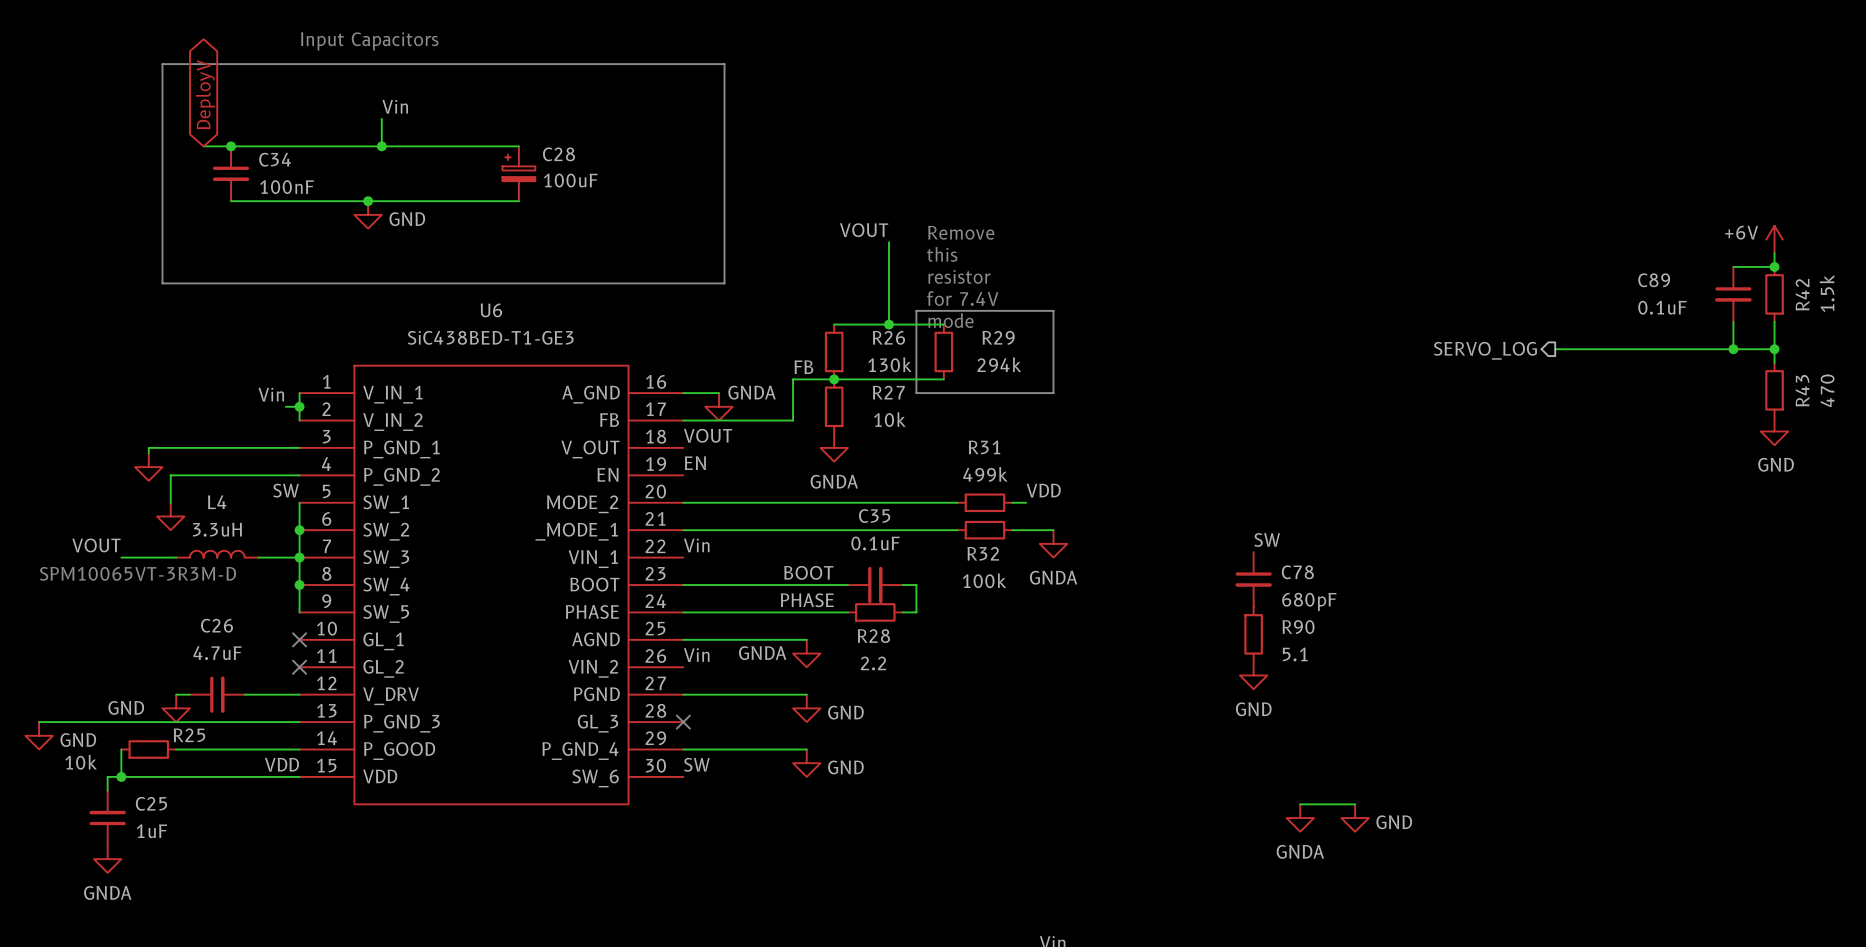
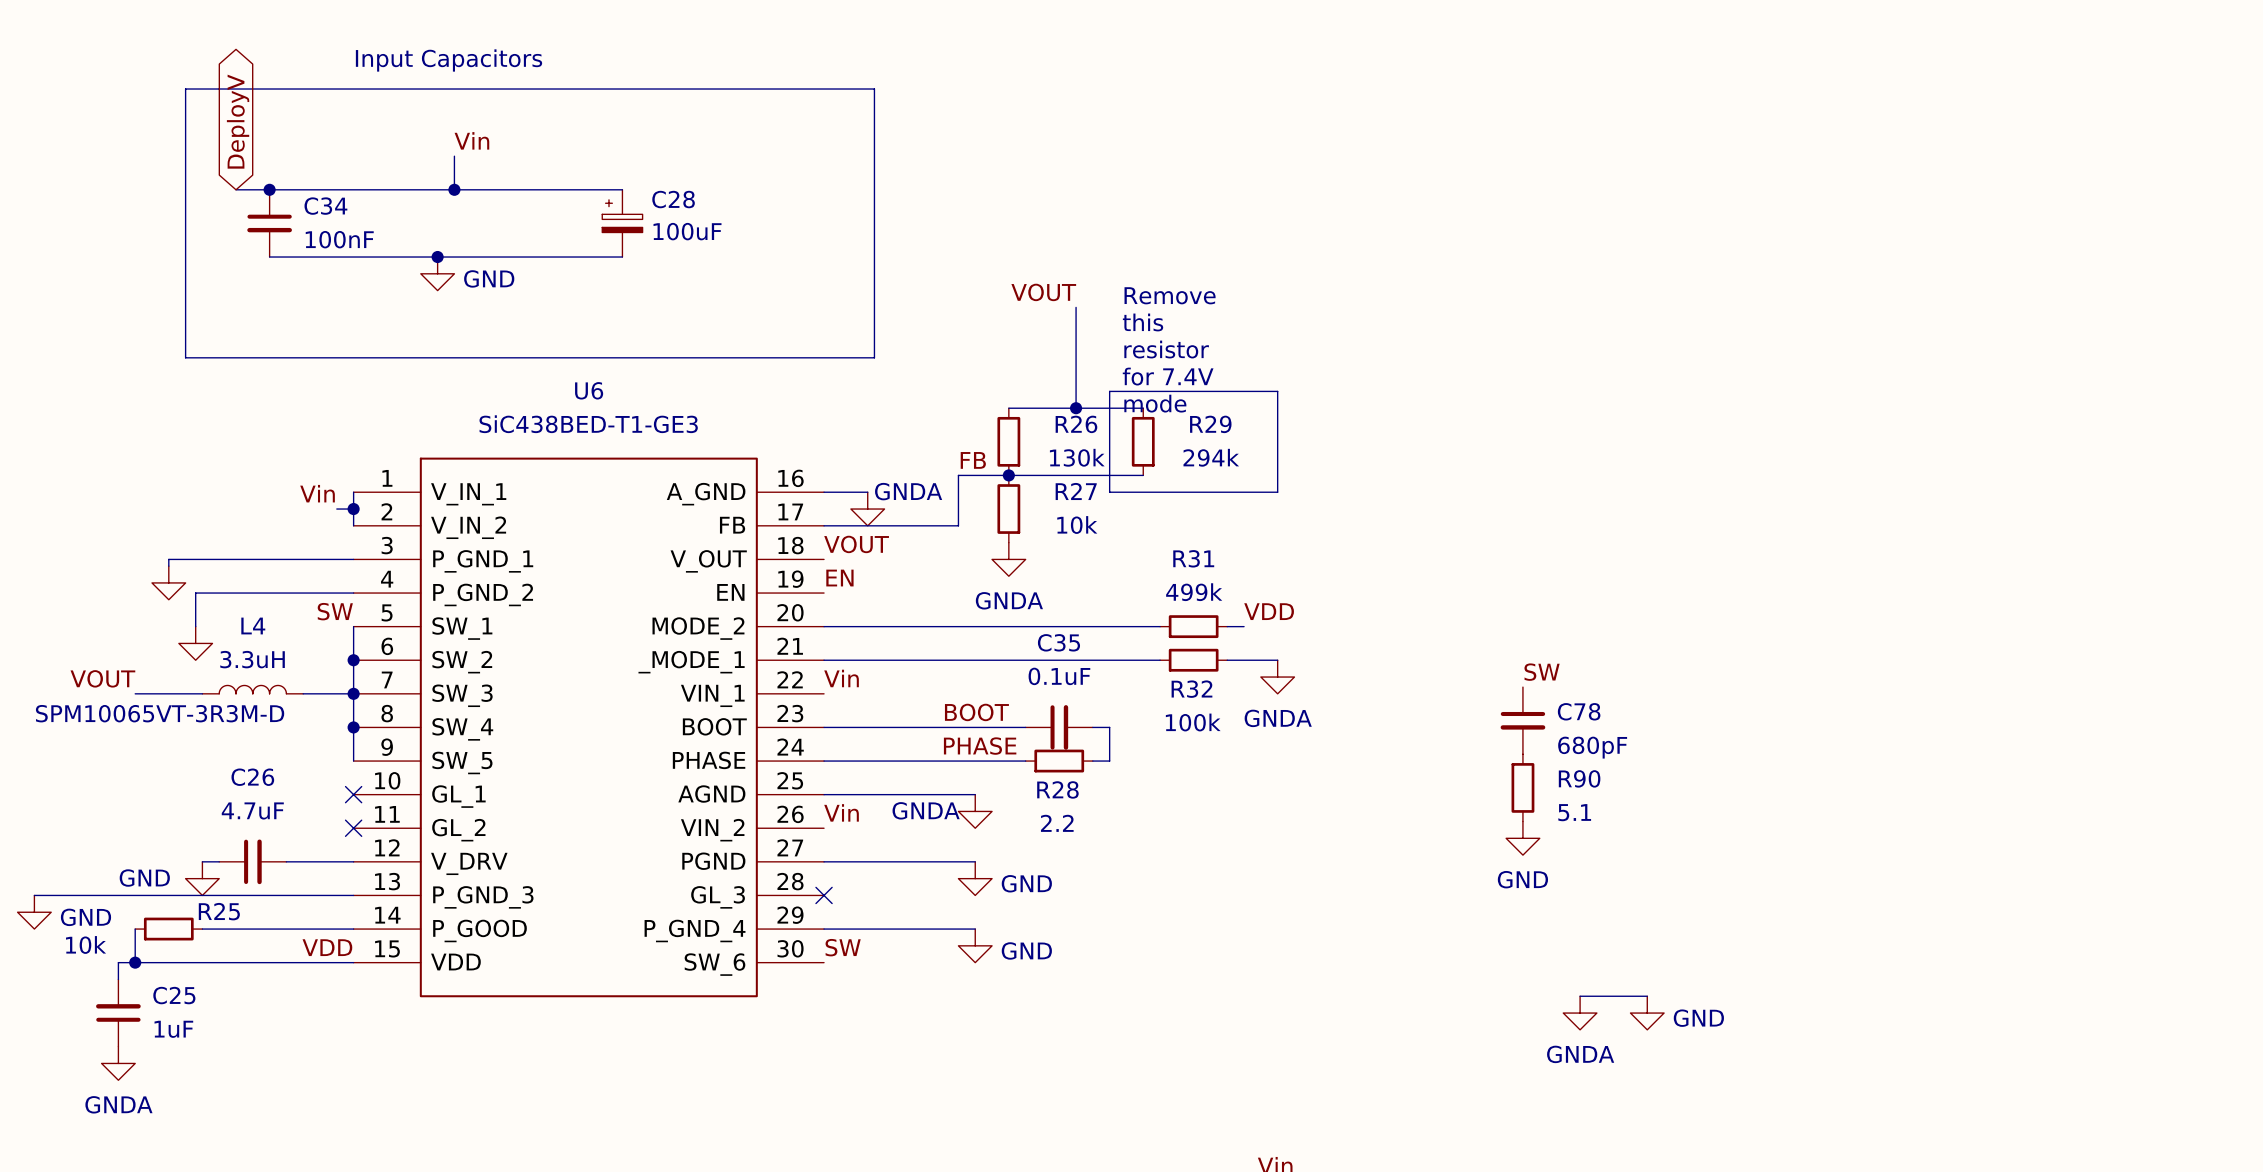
power symbol: +6V (1774, 239) -> none
wire: (1774, 253) (1774, 266) (1733, 266) -> none
junction: (1774, 266) -> none
C89: 0.1uF (1733, 294) -> none
R42: 1.5k (1774, 294) -> none
wire: (1733, 321) (1733, 349) -> none
wire: (1774, 321) (1774, 362) -> none
wire: (1555, 349) (1774, 349) -> none
junction: (1733, 349) -> none
junction: (1774, 349) -> none
hierarchical label: SERVO_LOG (1485, 350) -> none
R43: 470 (1774, 390) -> none
power symbol: GND (1774, 431) -> none

